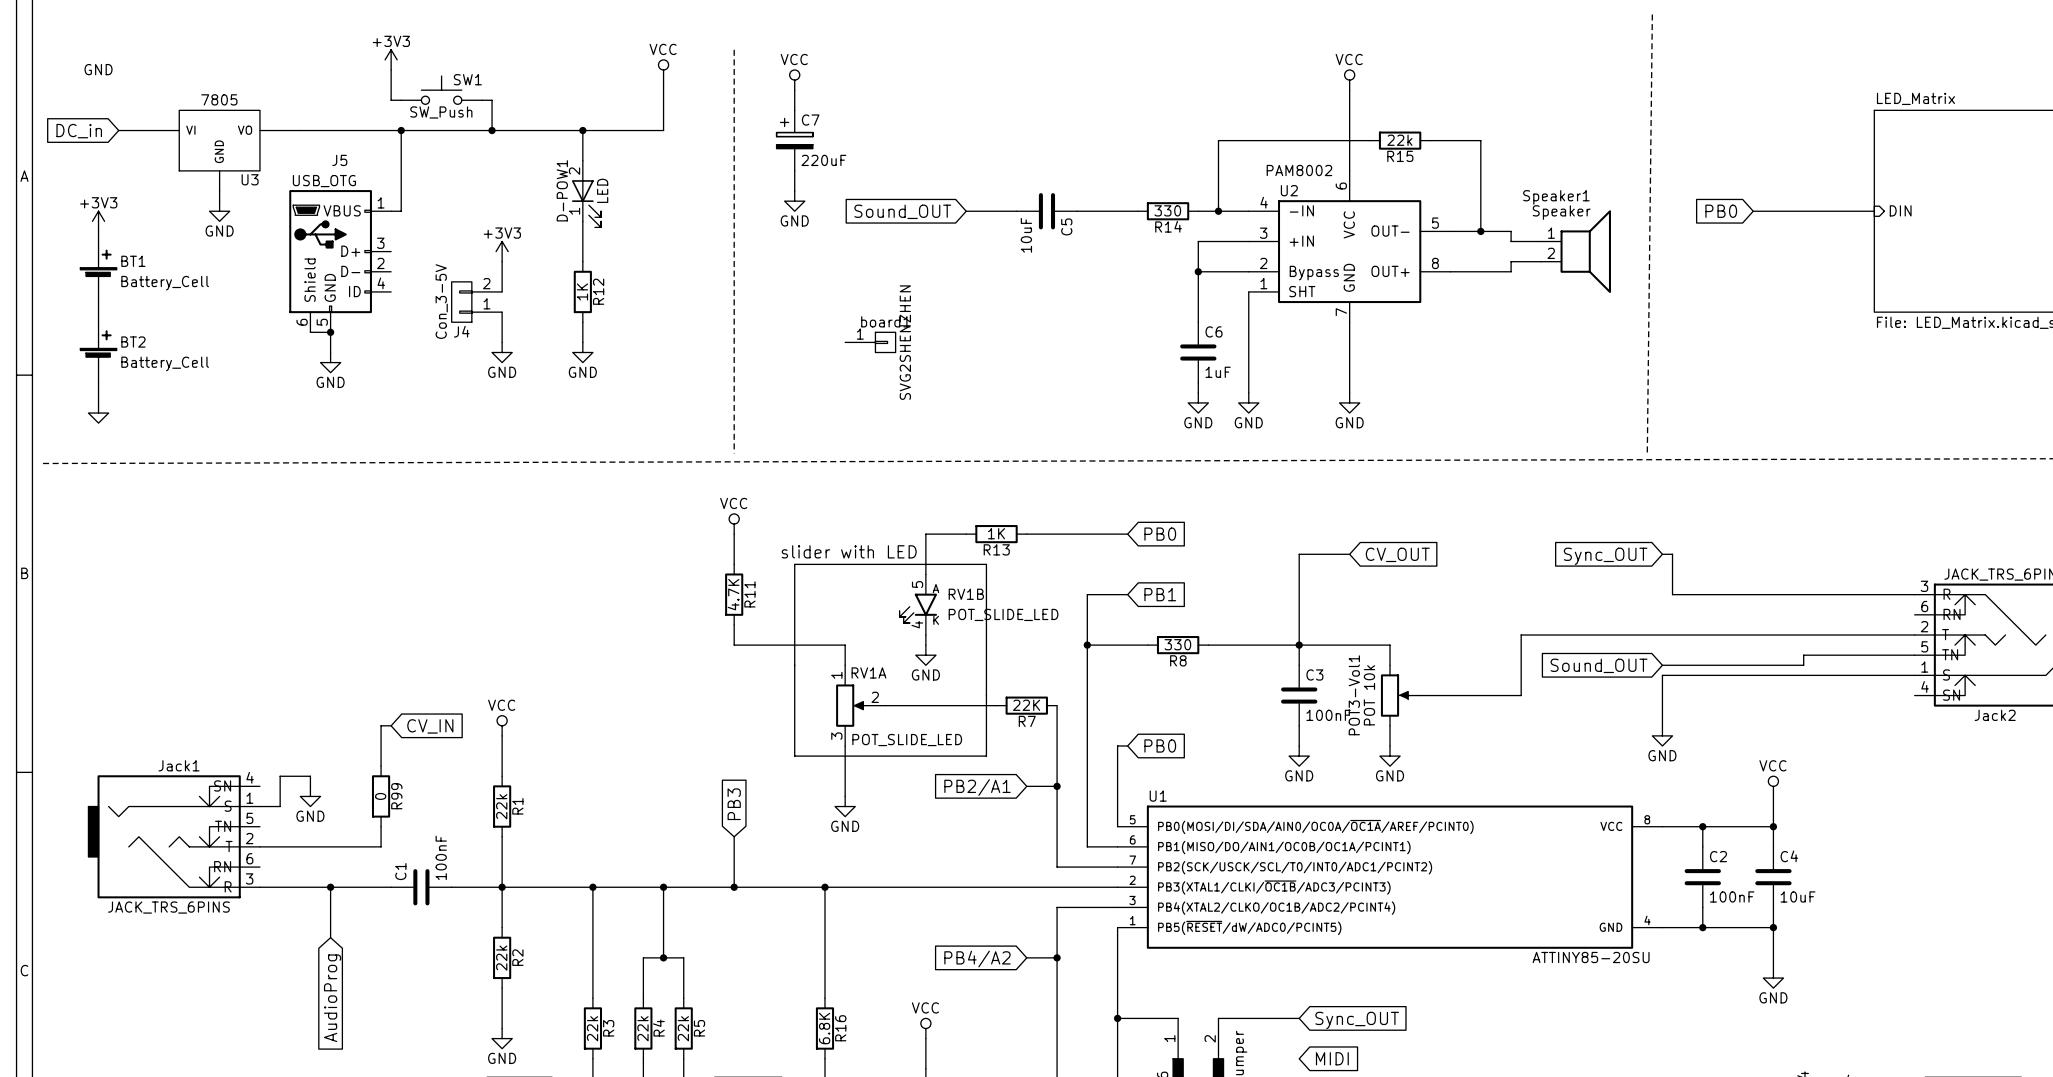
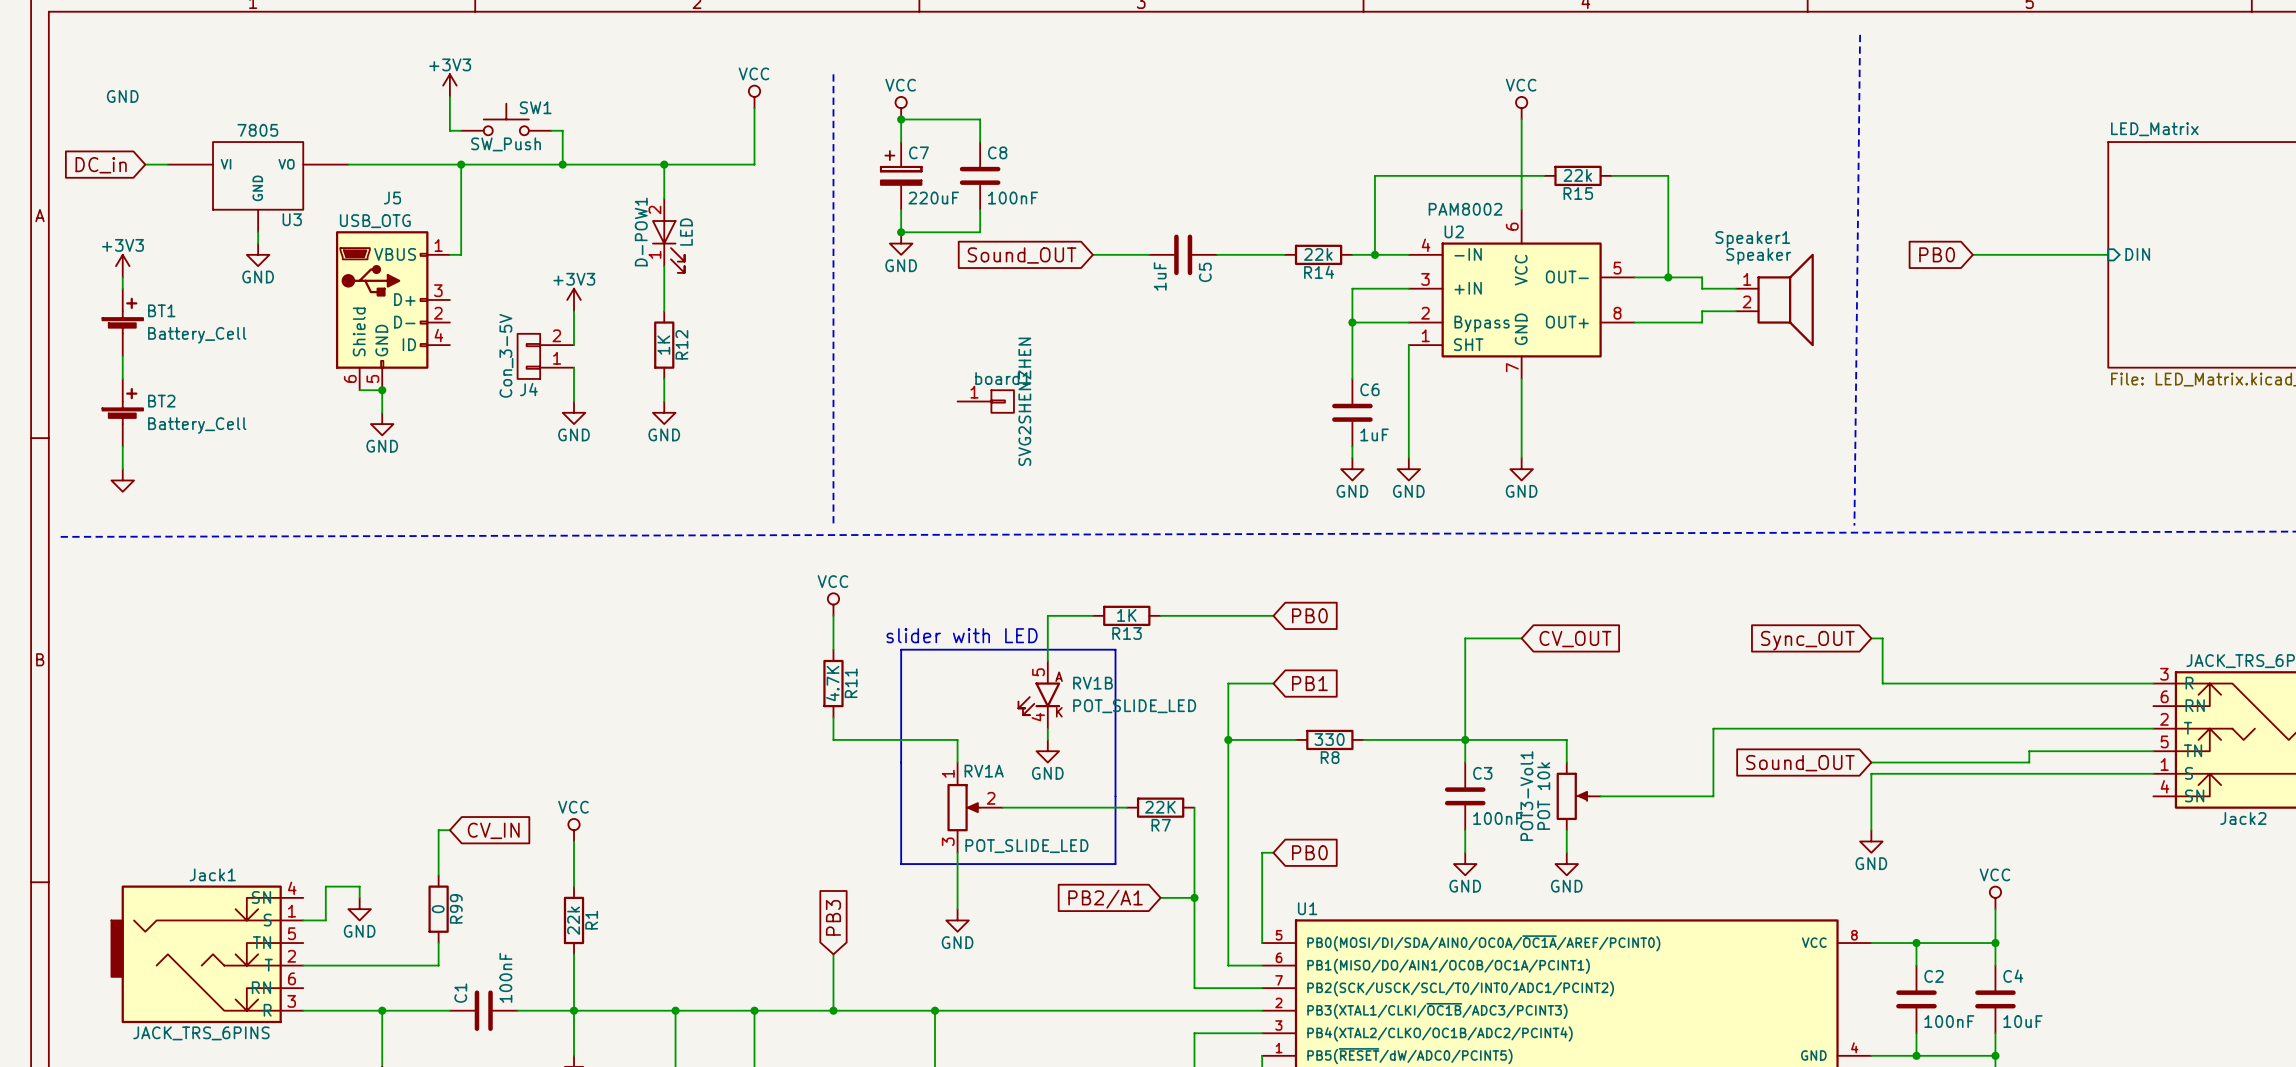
wire: none -> (901, 119) (980, 119) (980, 142)
junction: none -> (901, 119)
C8: none -> 100nF (980, 175)
wire: none -> (980, 209) (980, 232) (901, 232)
junction: none -> (901, 232)
R14 value: 330 (1167, 210) -> 22k (1318, 254)
C5 value: 10uF (1026, 235) -> 1uF (1160, 276)

